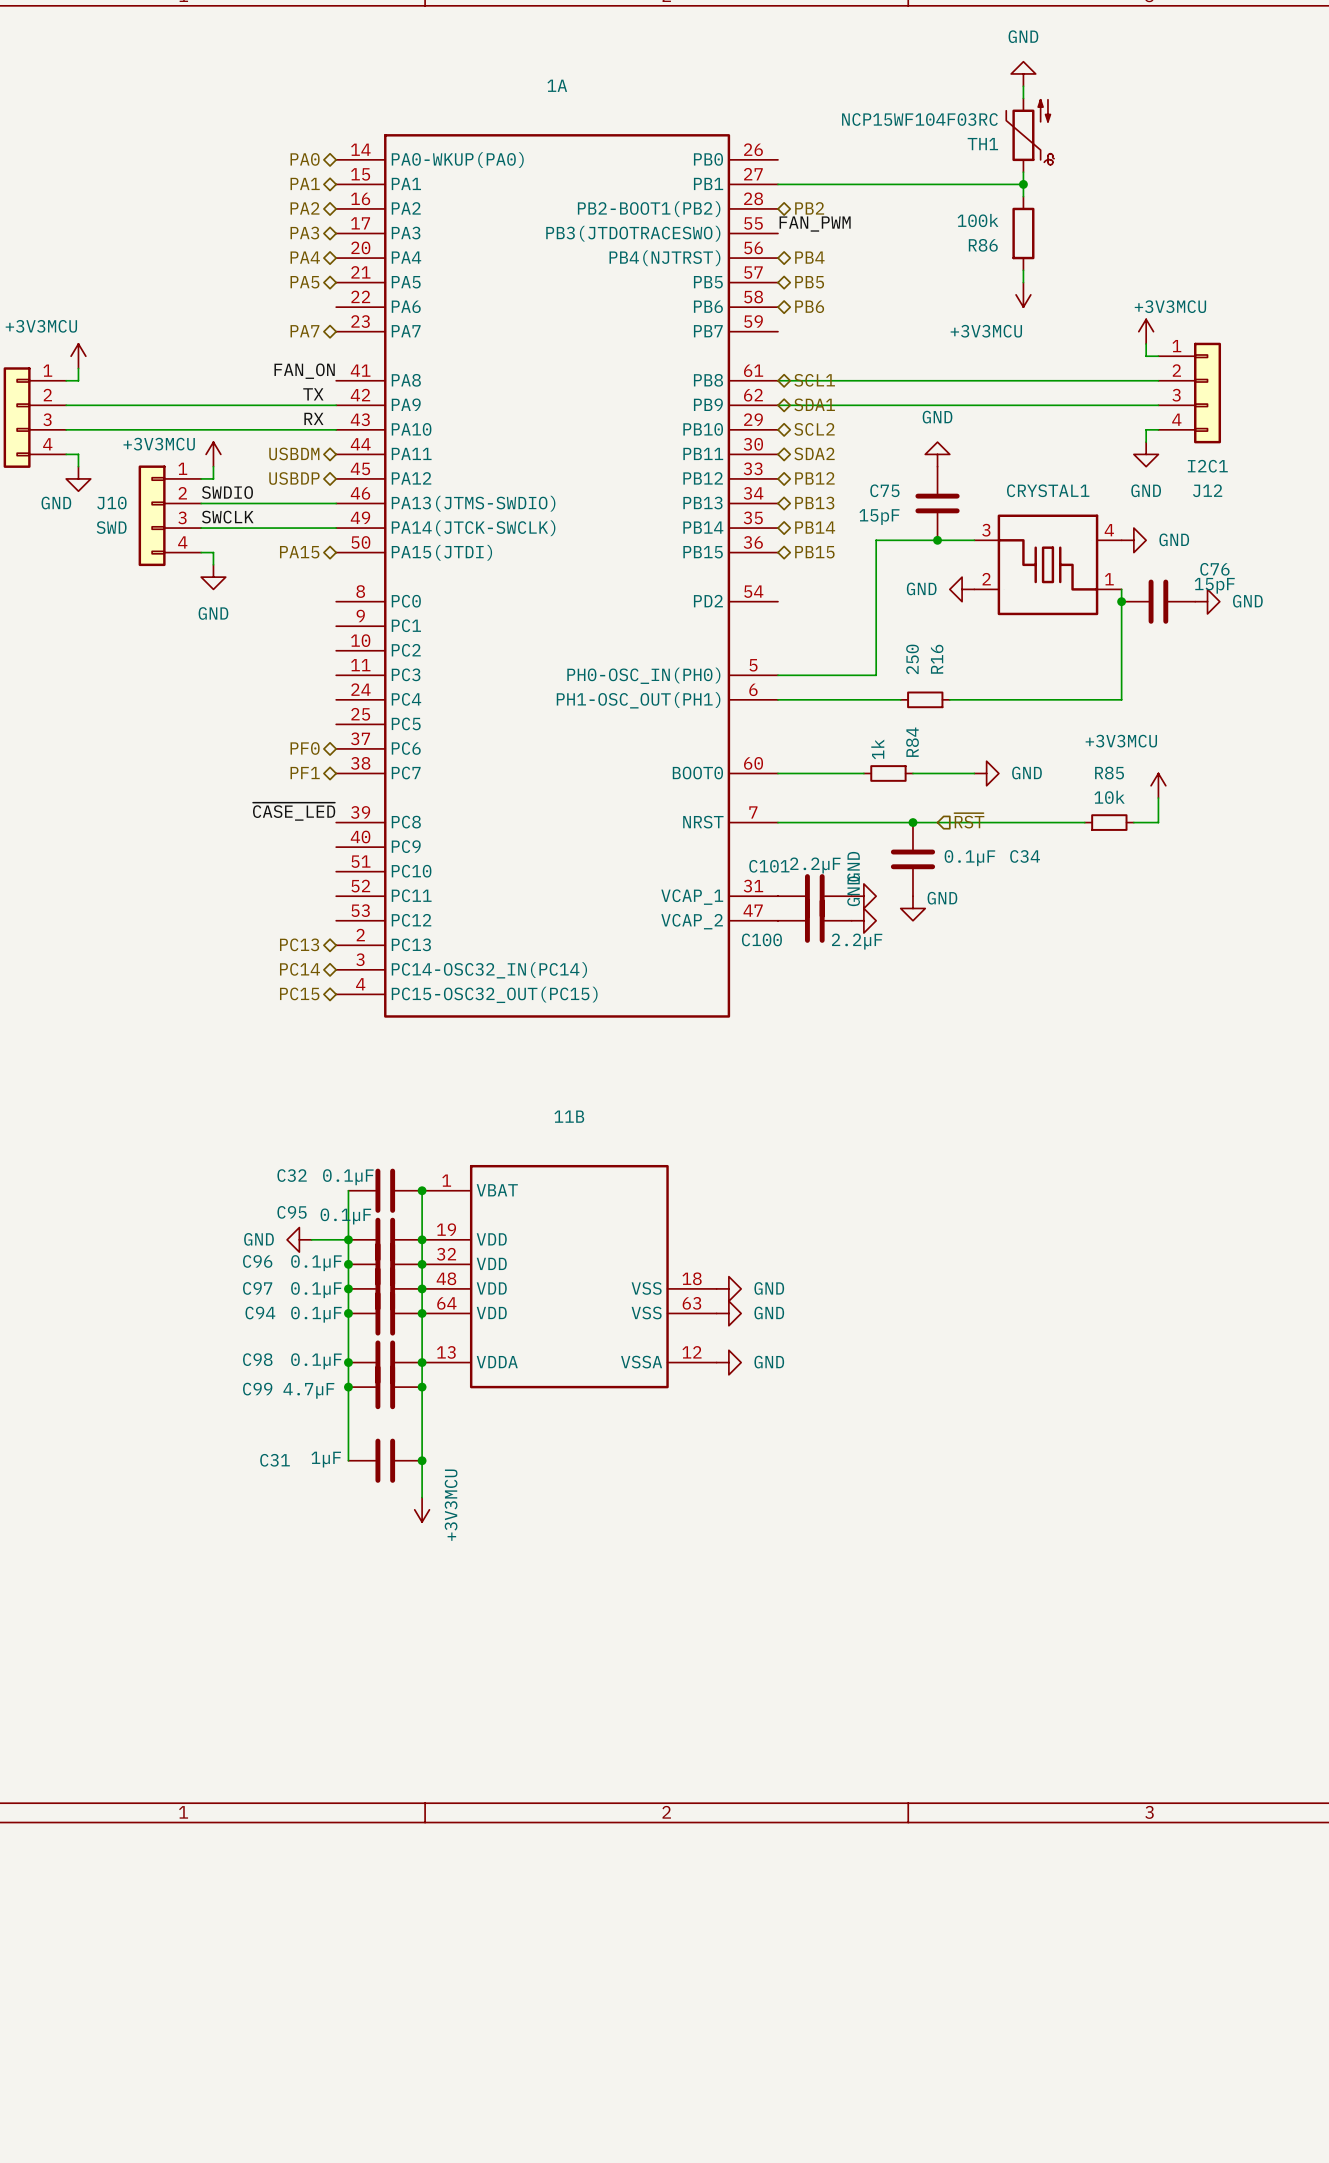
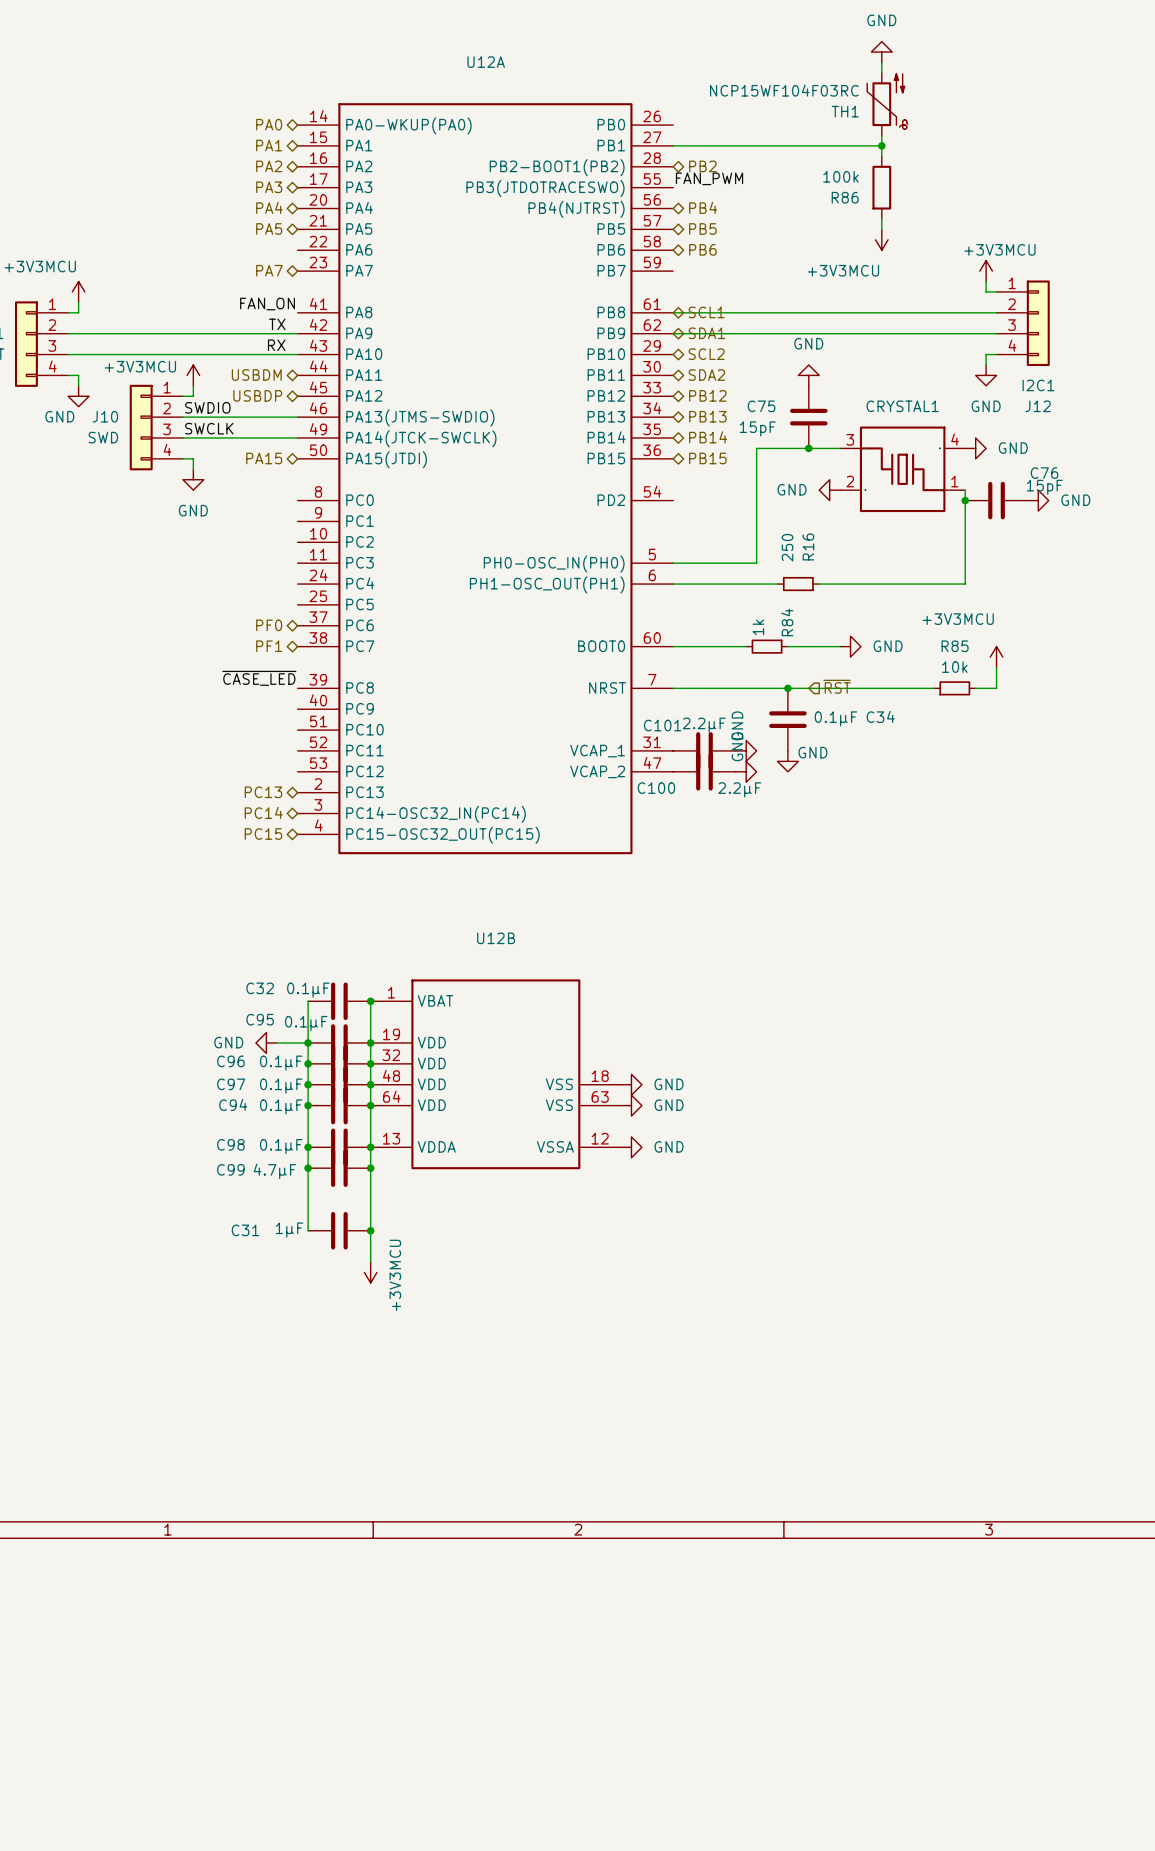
1A name: 1A (557, 85) -> U12A (486, 62)
11B name: 11B (569, 1116) -> U12B (496, 938)

